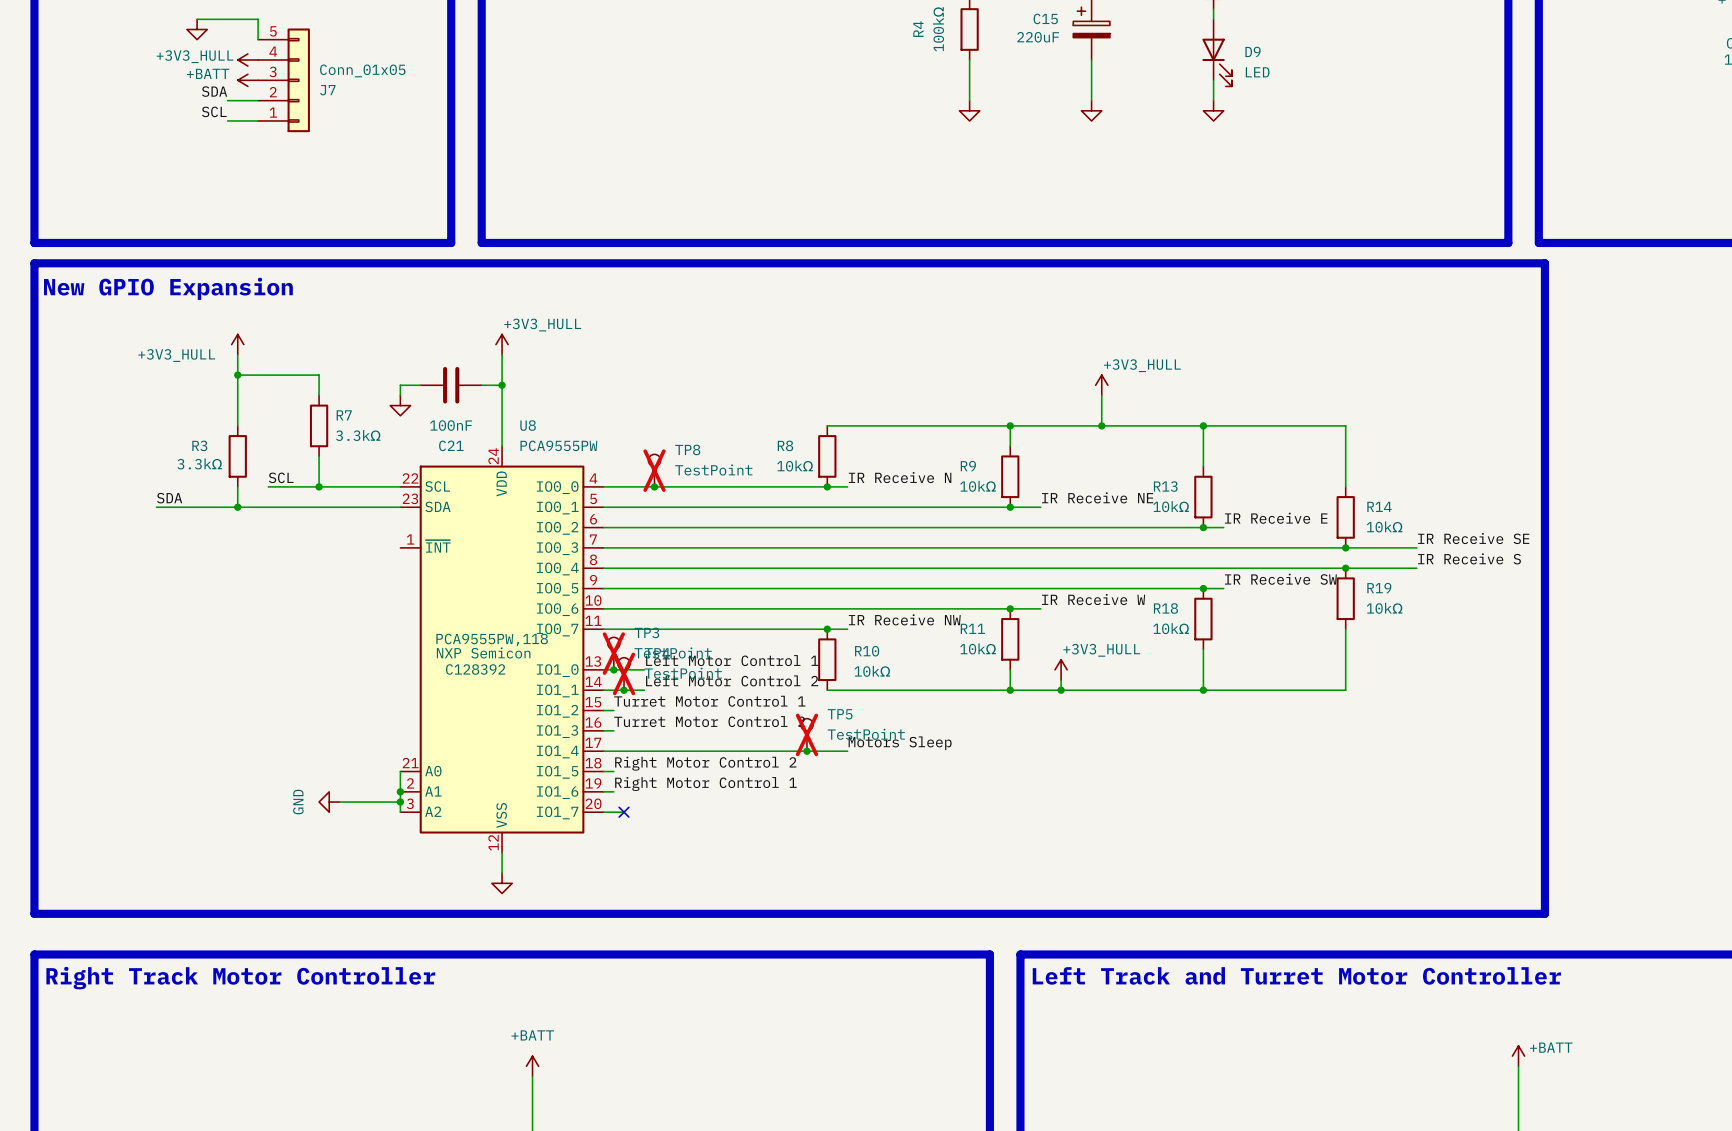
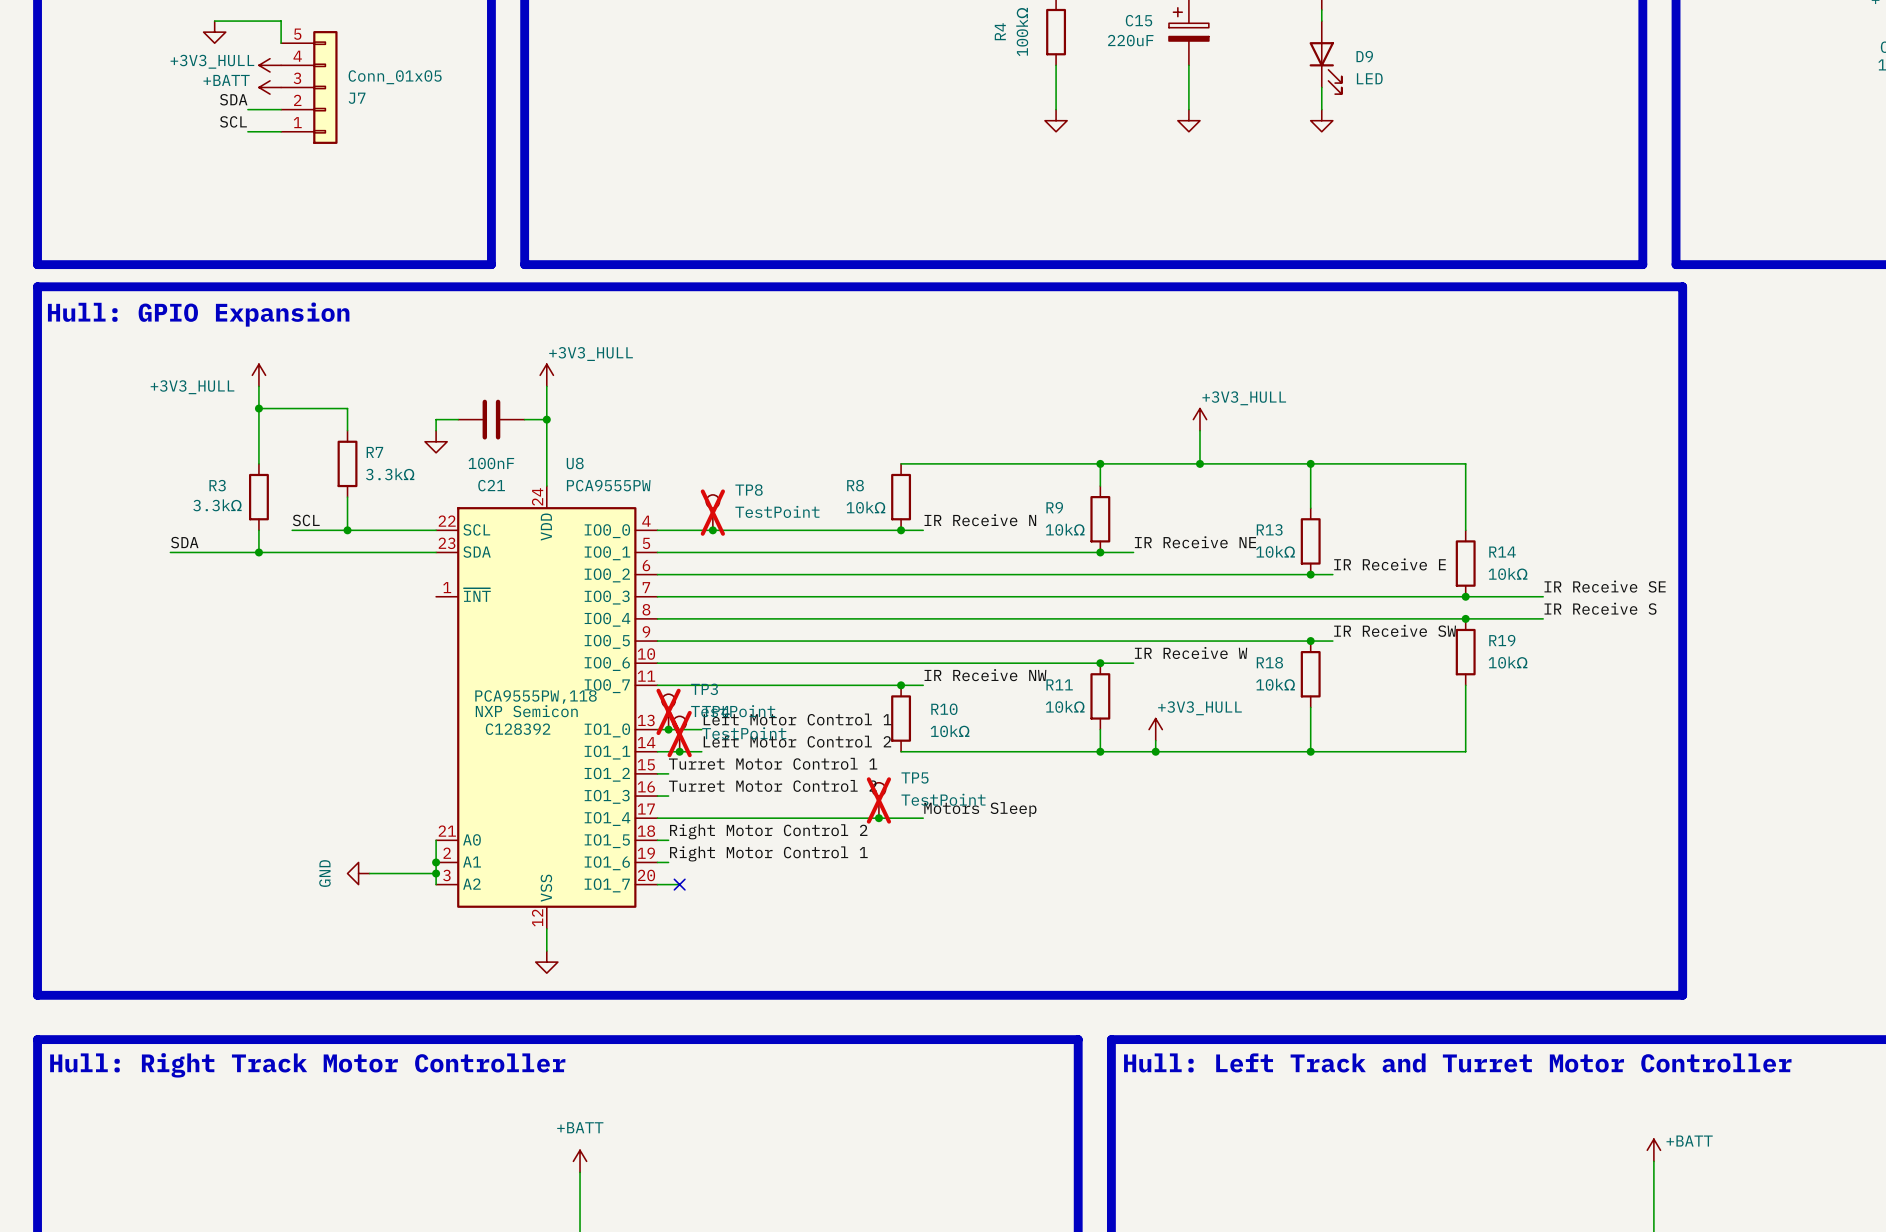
text: New GPIO Expansion (168, 288) -> Hull: GPIO Expansion (198, 314)
text: Left Track and Turret Motor Controller (1296, 975) -> Hull: Left Track and Turret Motor Controller (1457, 1062)
text: Right Track Motor Controller (240, 978) -> Hull: Right Track Motor Controller (307, 1065)

